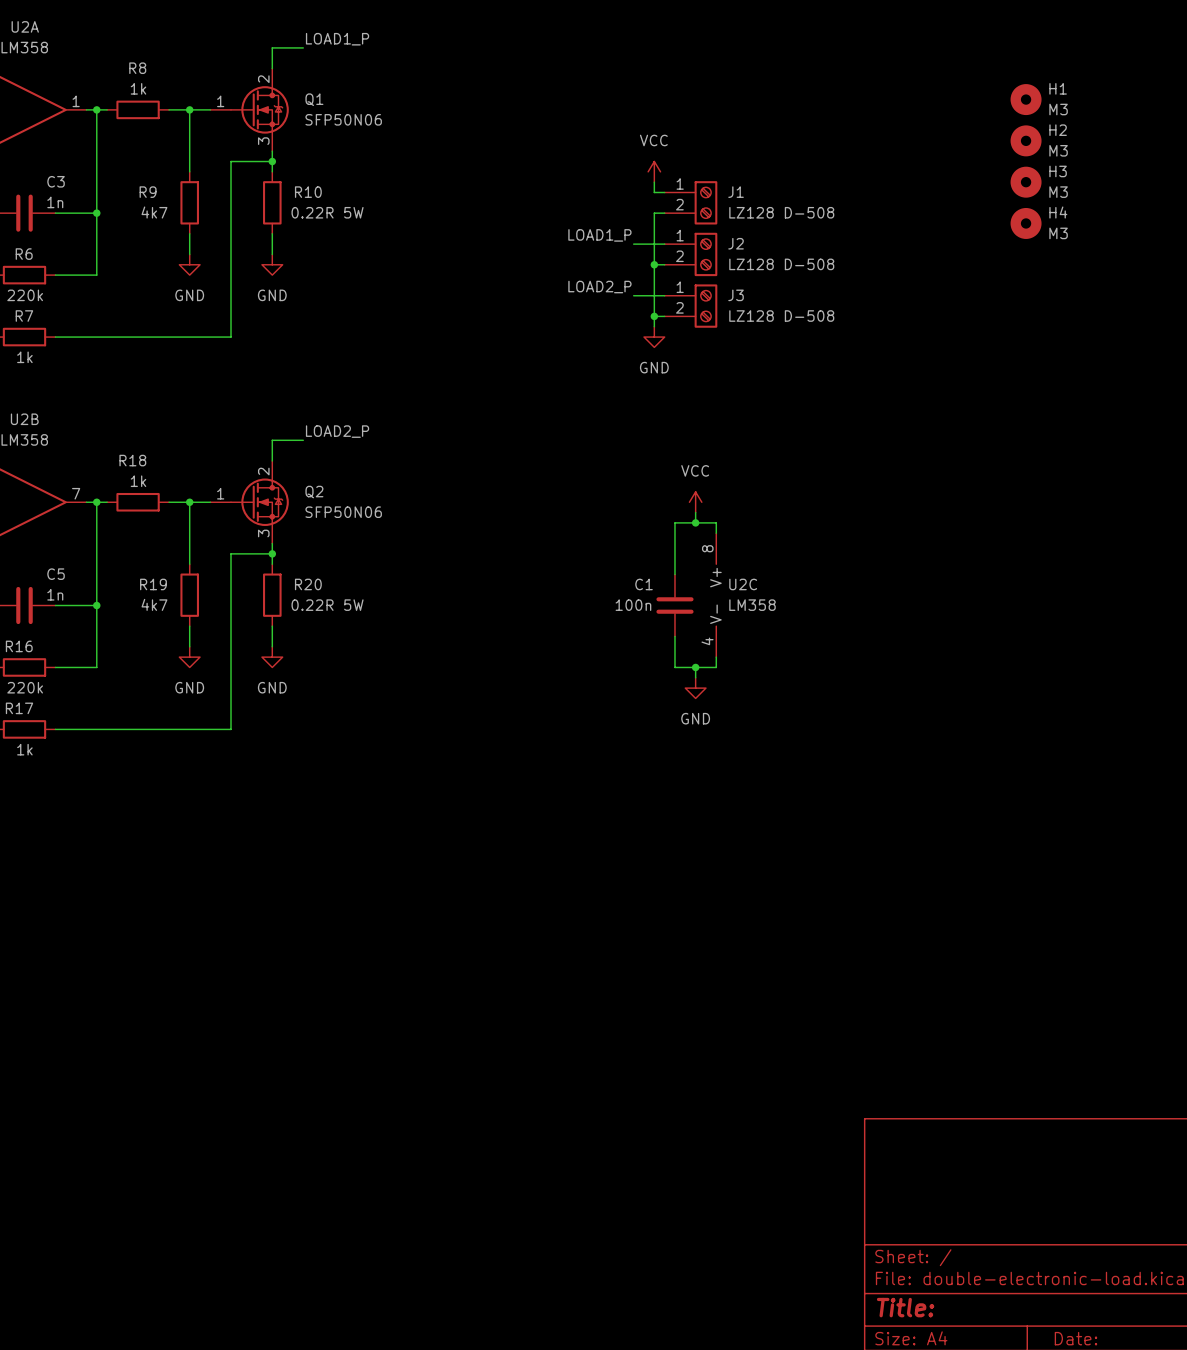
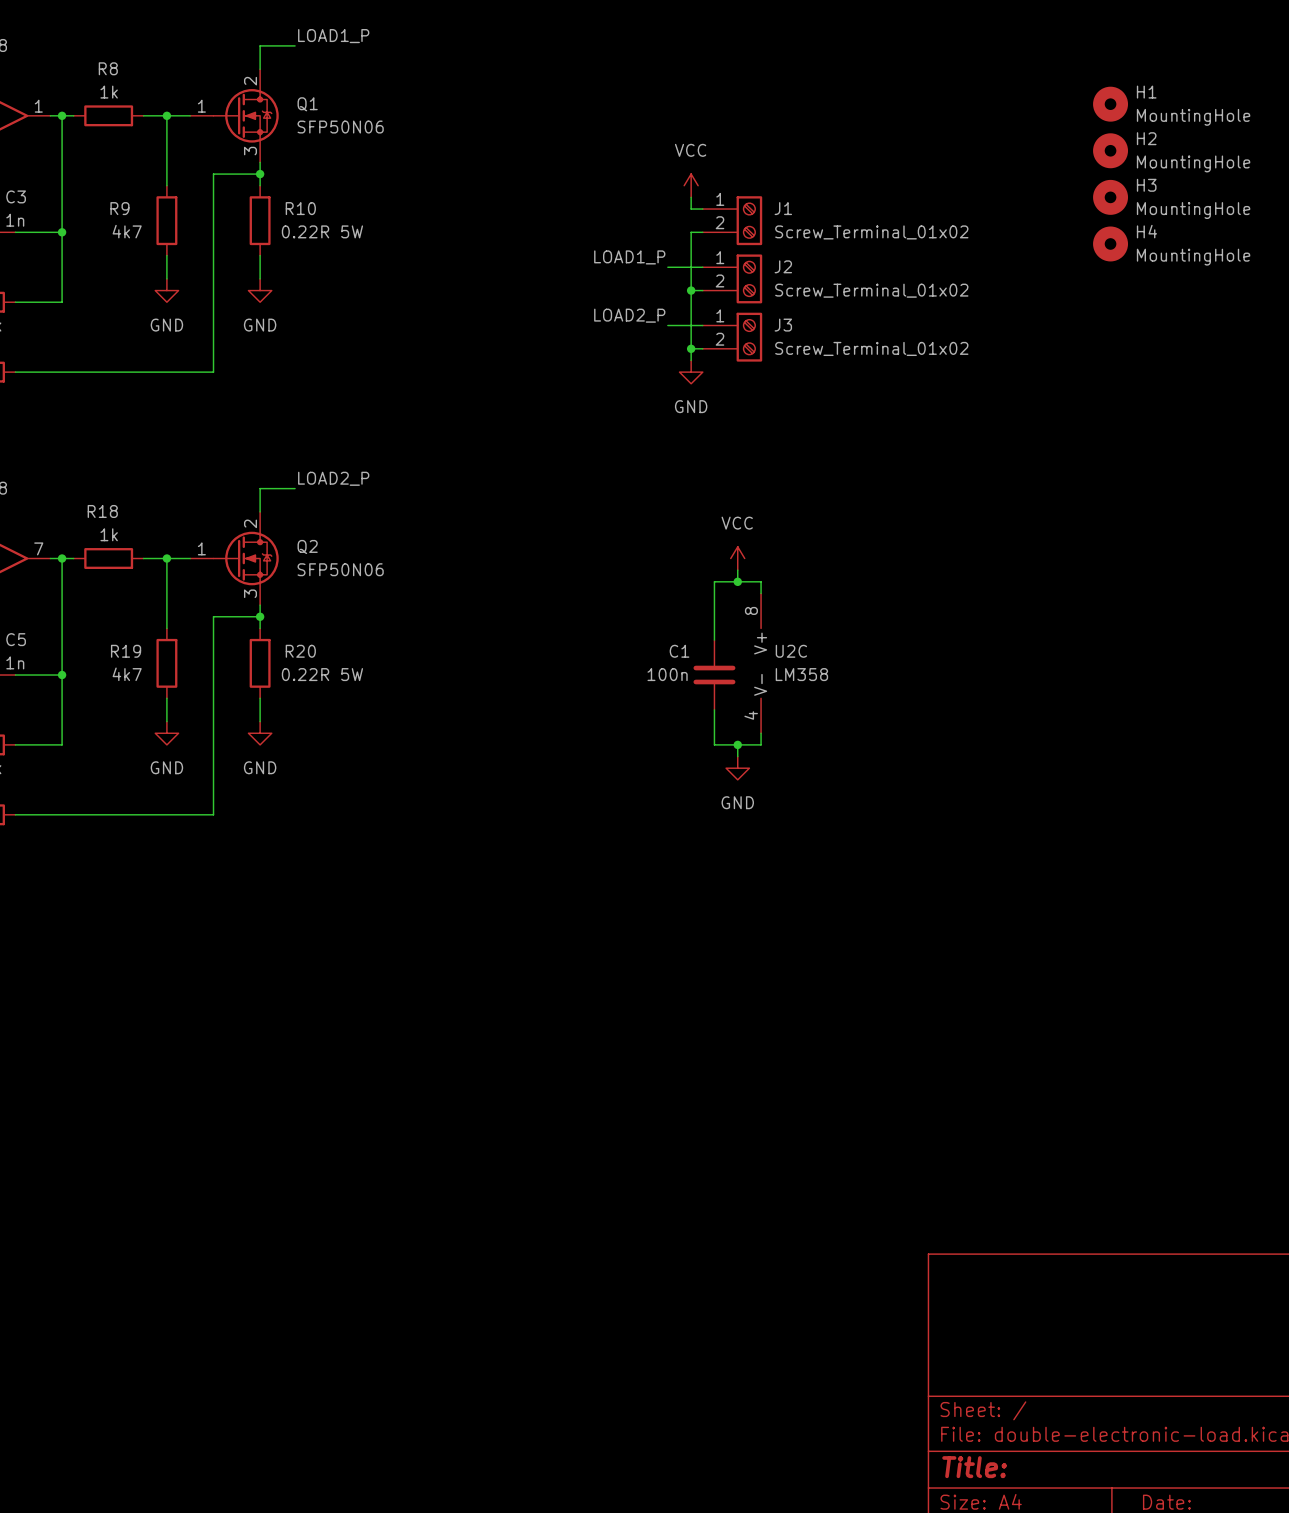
H1 value: M3 (1058, 109) -> MountingHole (1193, 117)
H2 value: M3 (1058, 150) -> MountingHole (1193, 163)
H3 value: M3 (1058, 192) -> MountingHole (1193, 210)
J1 value: LZ128 D-508 (781, 212) -> Screw_Terminal_01x02 (871, 232)
H4 value: M3 (1058, 233) -> MountingHole (1193, 257)
J2 value: LZ128 D-508 (781, 264) -> Screw_Terminal_01x02 (871, 290)
J3 value: LZ128 D-508 (781, 316) -> Screw_Terminal_01x02 (871, 348)

